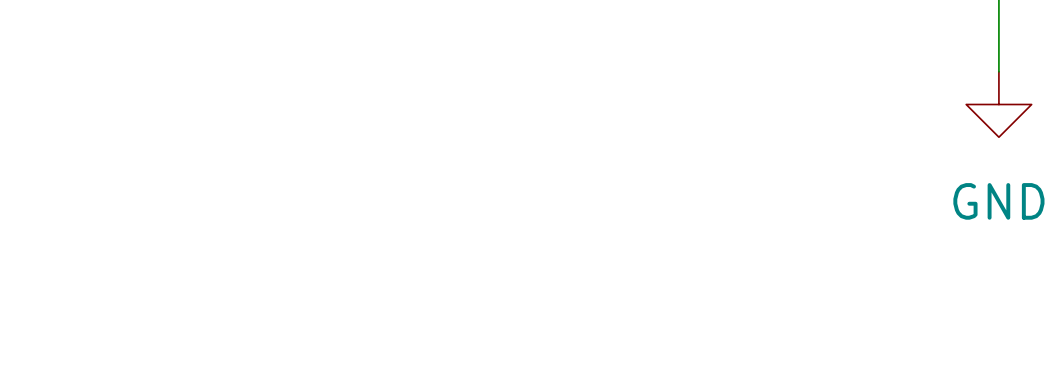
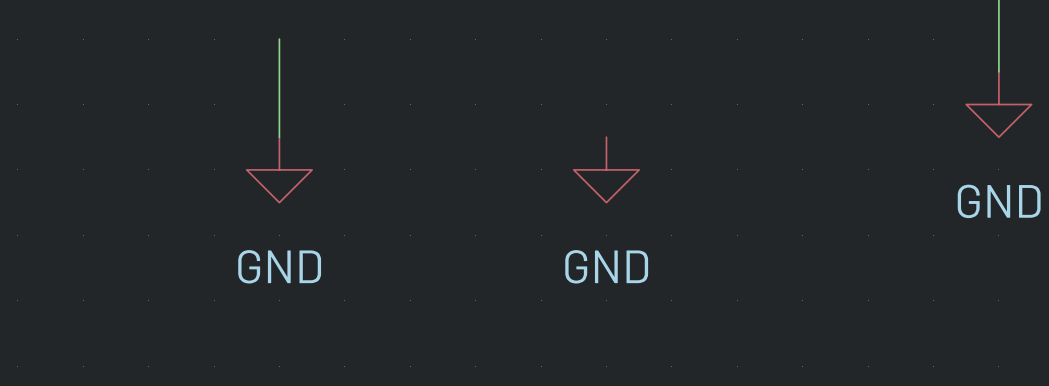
wire: none -> (279, 39) (279, 137)
power symbol: none -> GND (279, 169)
power symbol: none -> GND (606, 169)

